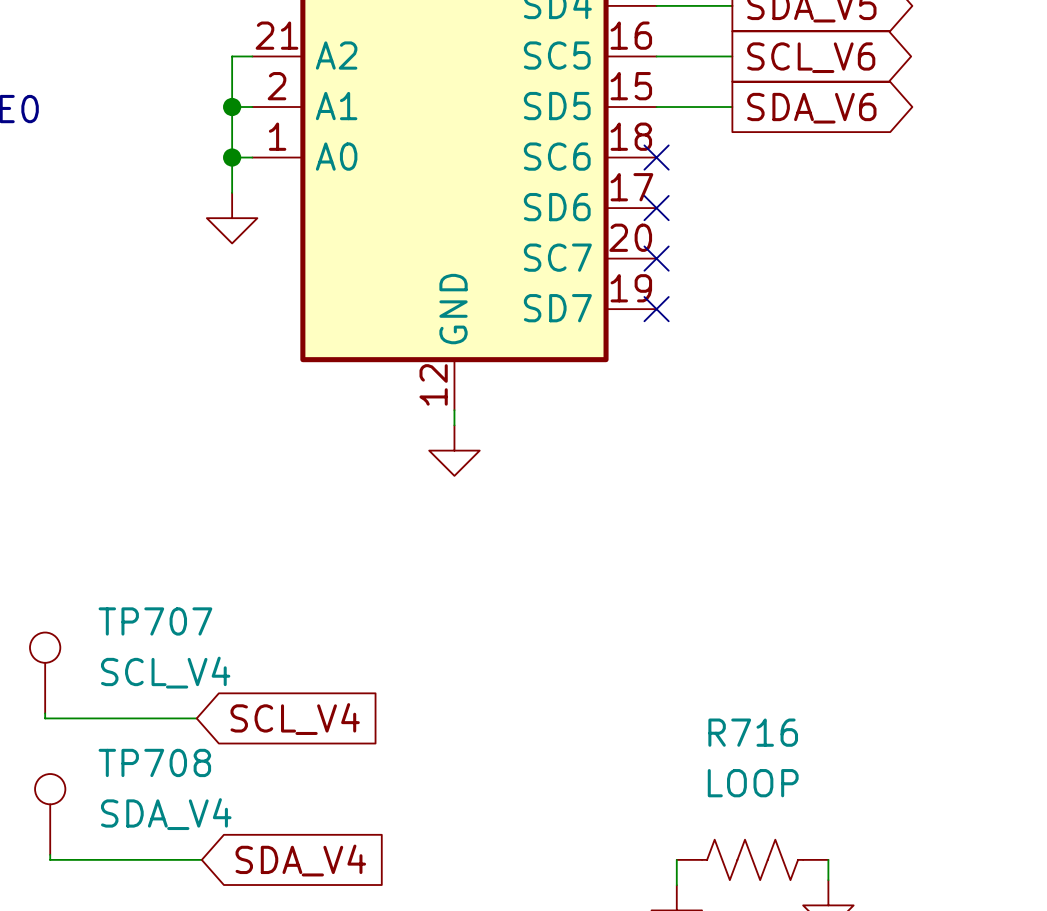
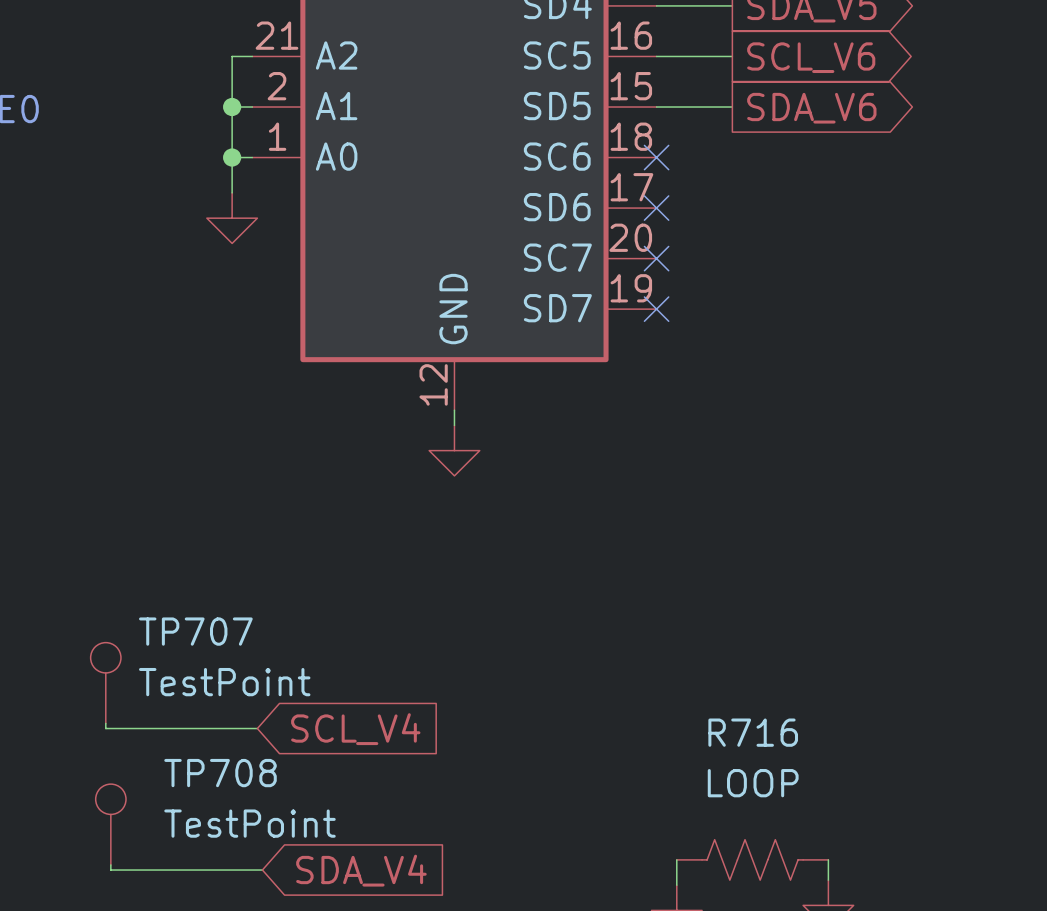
TP707 name position: TP707 (155, 621) -> TP707 (195, 631)
TP707 position: (45, 672) -> (105, 683)
TP707 value: SCL_V4 (165, 672) -> TestPoint (224, 682)
wire: (45, 713) (45, 718) (196, 718) -> (105, 723) (105, 728) (257, 728)
global label position: SCL_V4 (295, 719) -> SCL_V4 (355, 729)
TP708 name position: TP708 (154, 762) -> TP708 (220, 773)
TP708 position: (50, 814) -> (110, 824)
TP708 value: SDA_V4 (166, 814) -> TestPoint (250, 823)
wire: (50, 854) (50, 859) (201, 859) -> (110, 864) (110, 870) (262, 870)
global label position: SDA_V4 (300, 860) -> SDA_V4 (361, 870)

